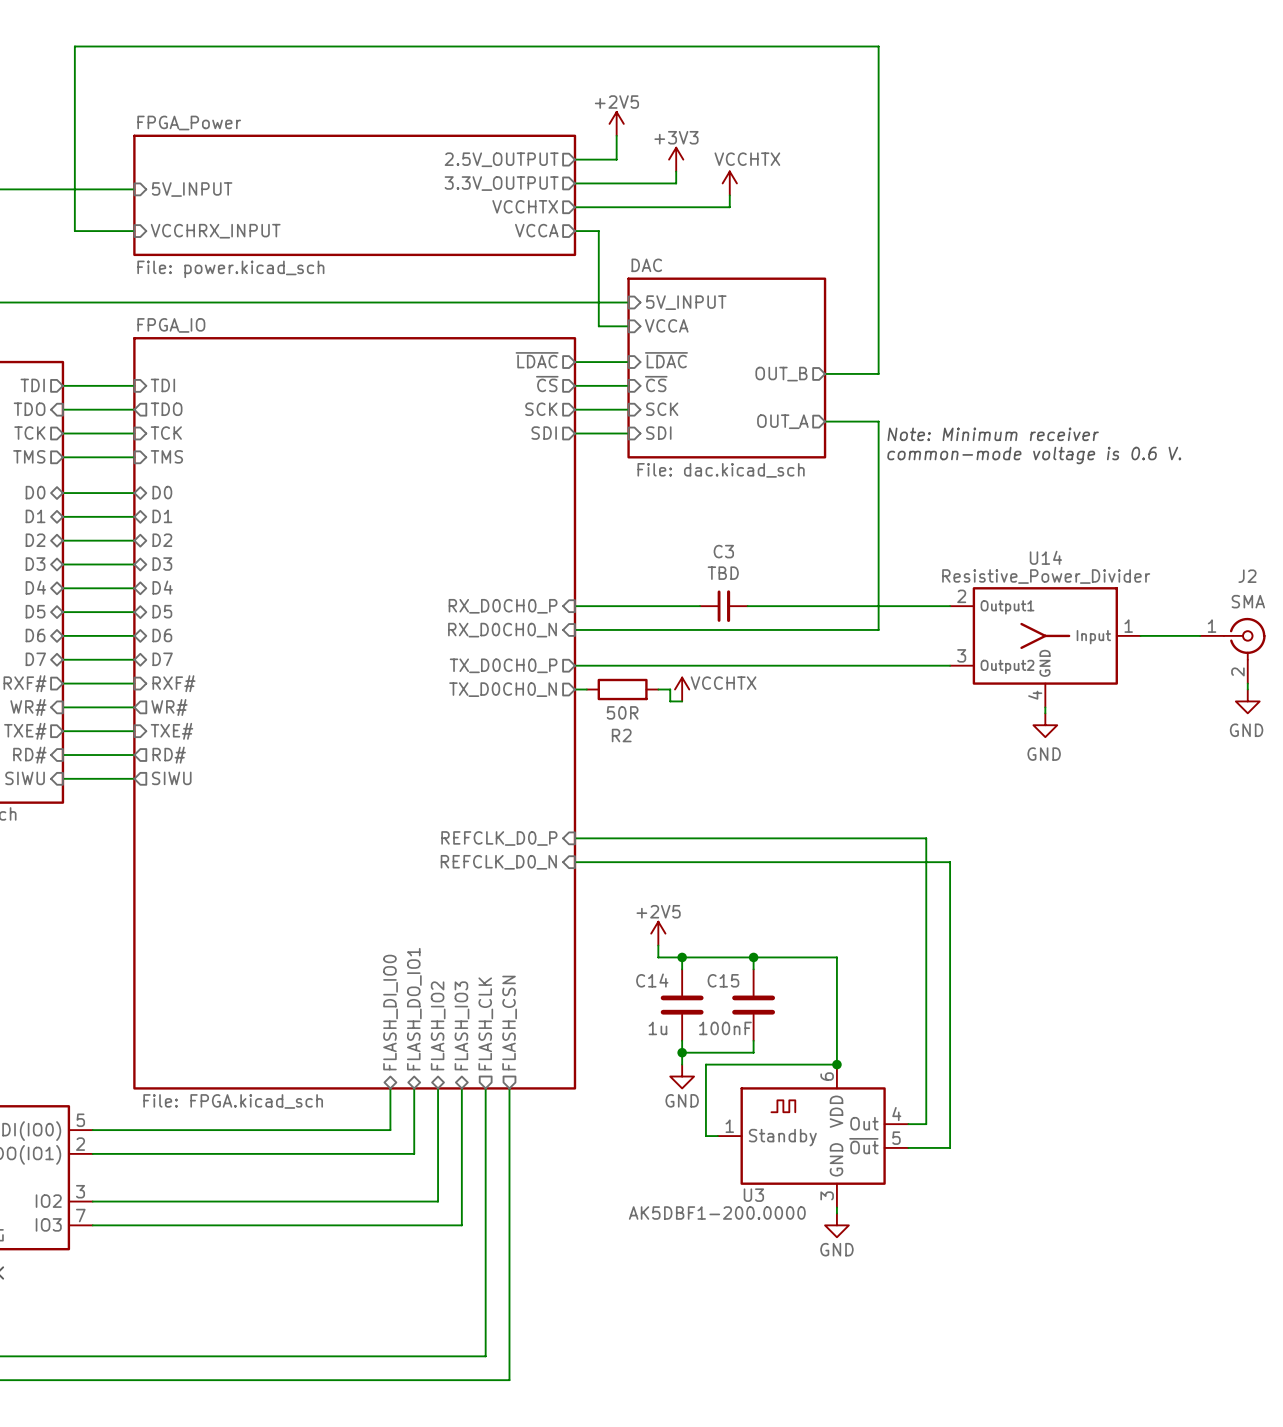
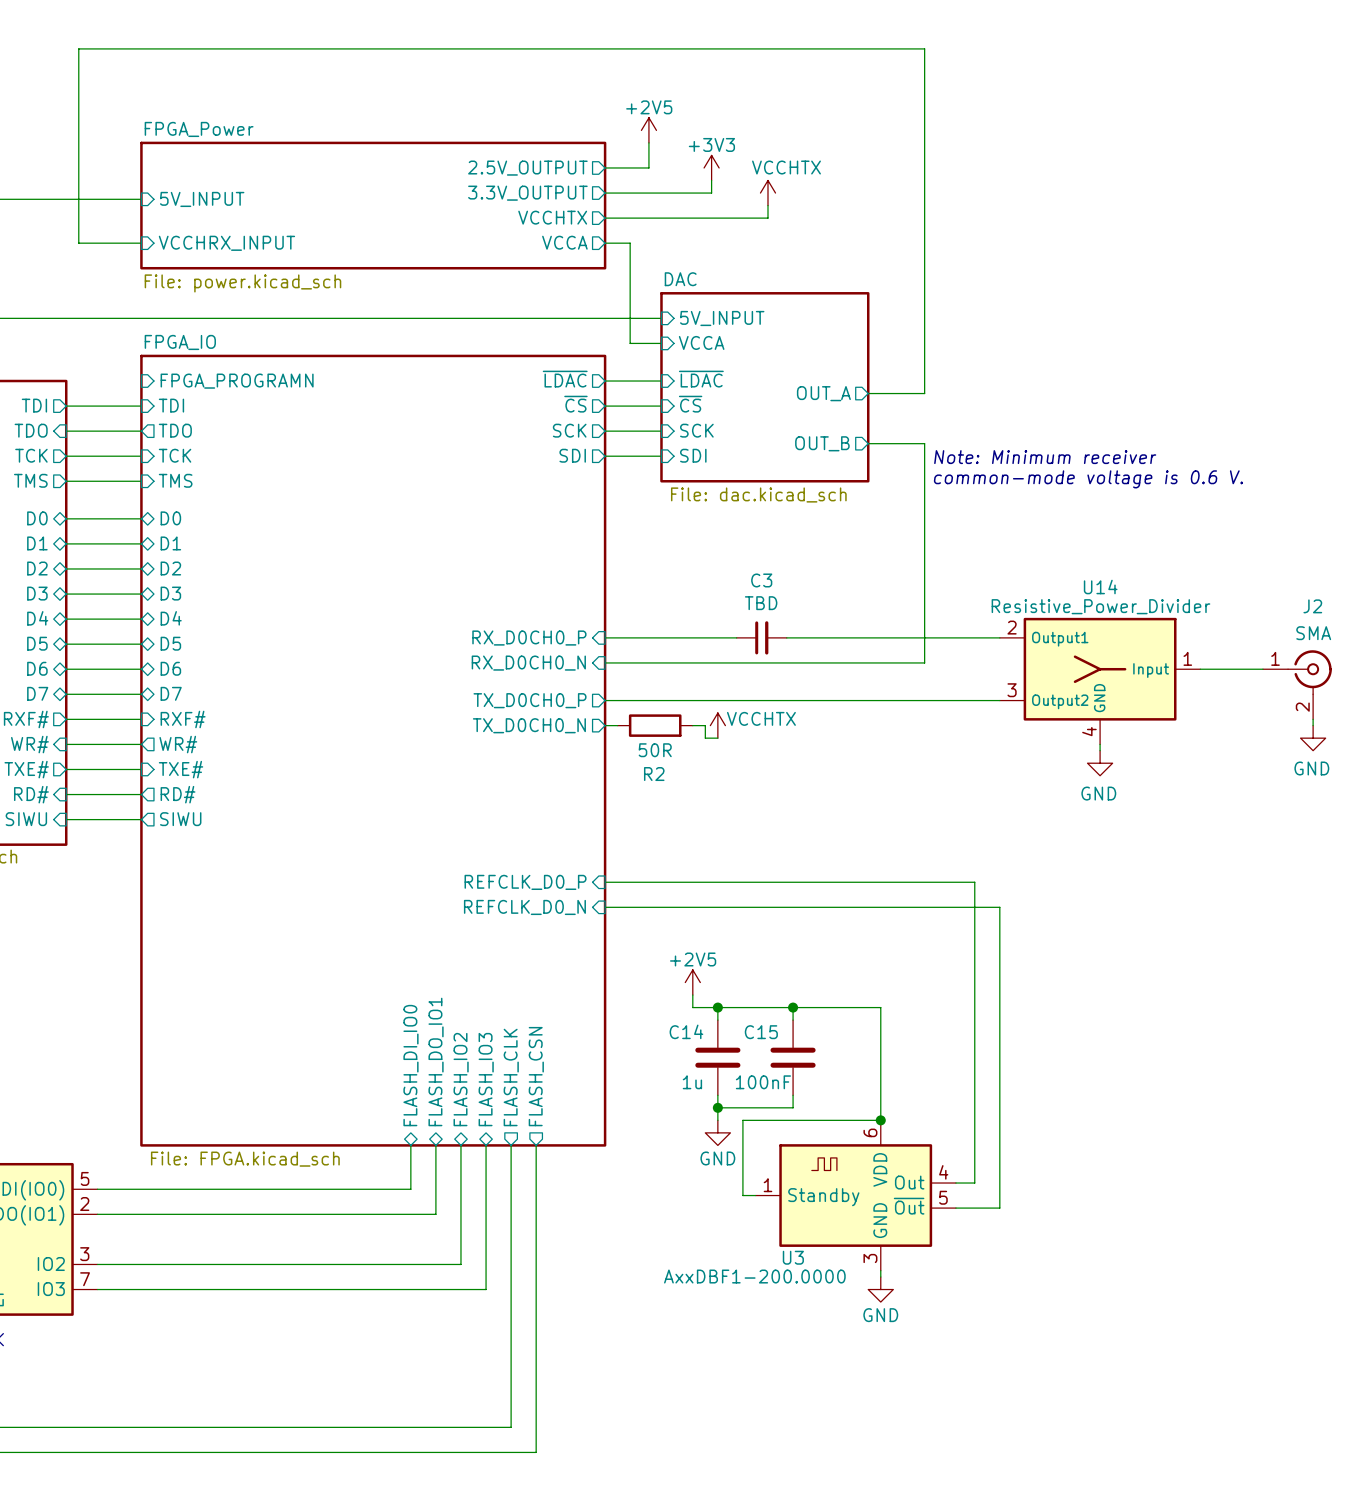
sheet pin: none -> FPGA_PROGRAMN (237, 381)
sheet pin: OUT_B (781, 374) -> OUT_A (823, 393)
sheet pin: OUT_A (782, 421) -> OUT_B (822, 443)
U3 value: AK5DBF1-200.0000 (717, 1213) -> AxxDBF1-200.0000 (754, 1276)

